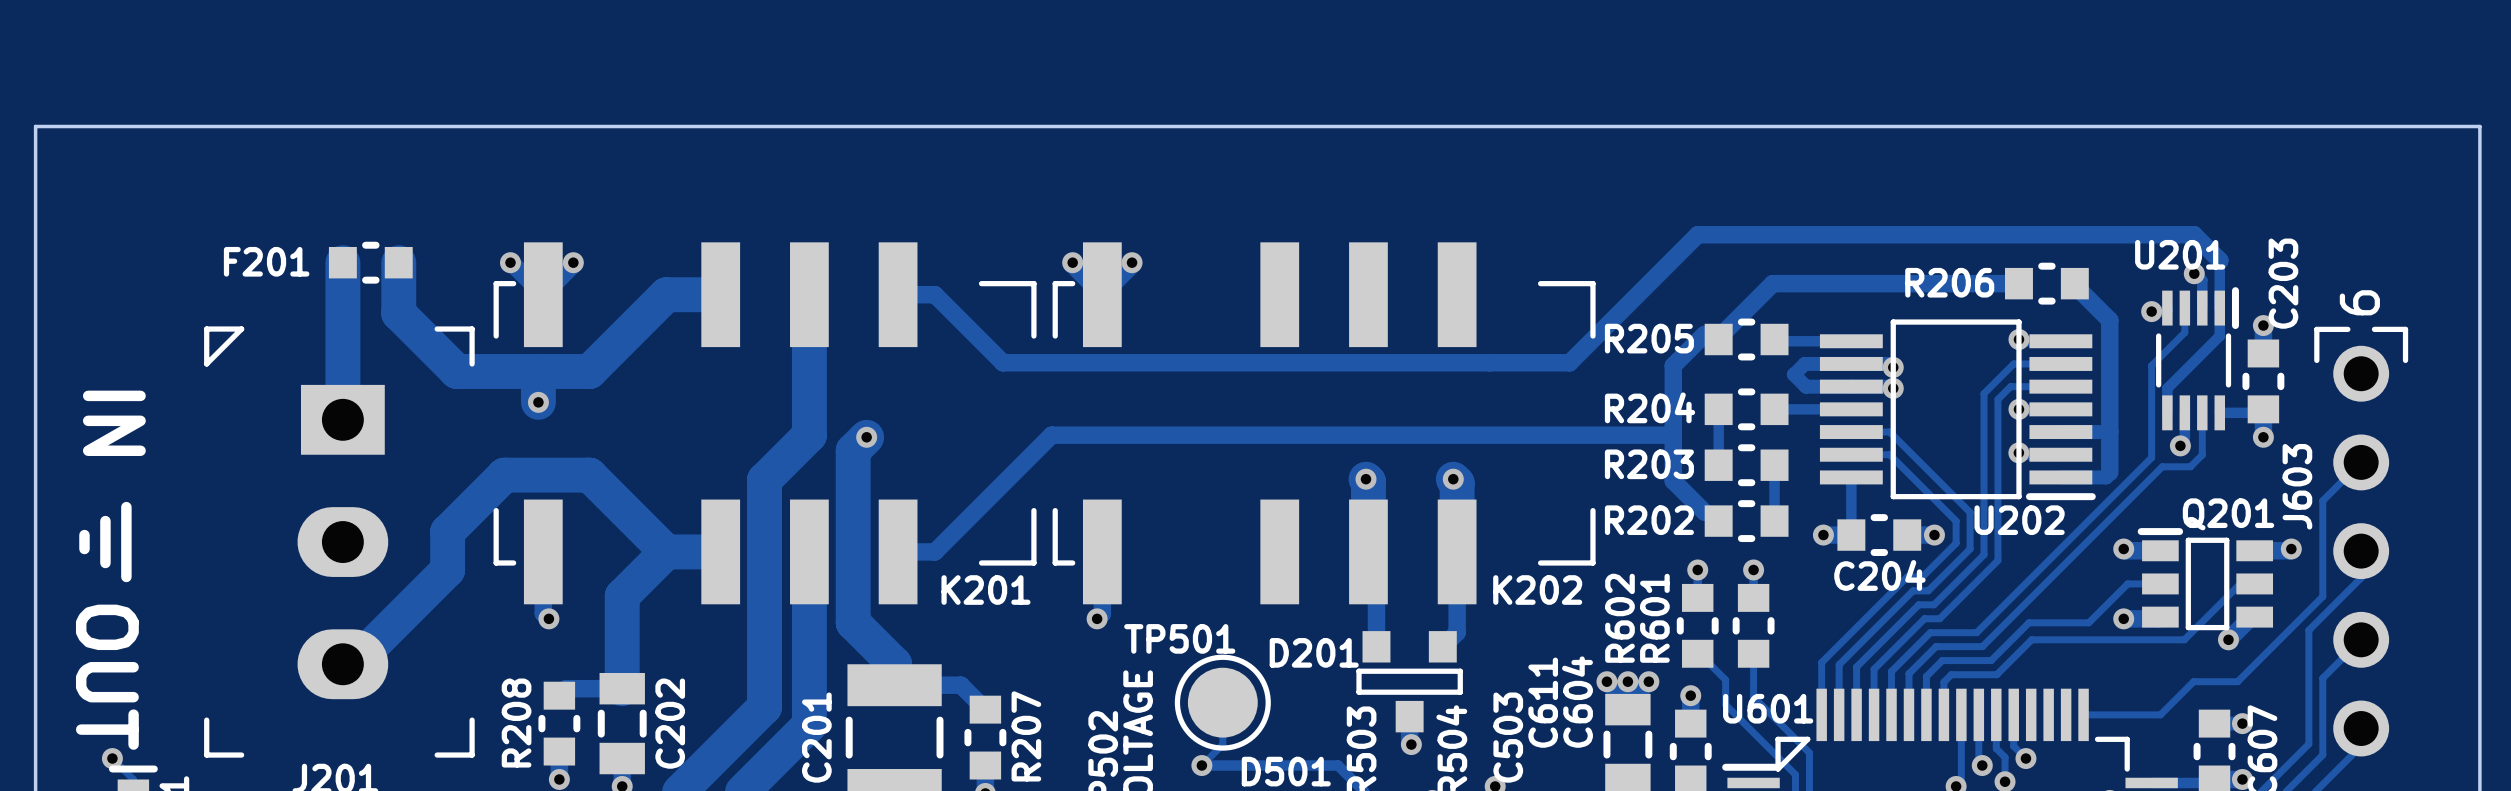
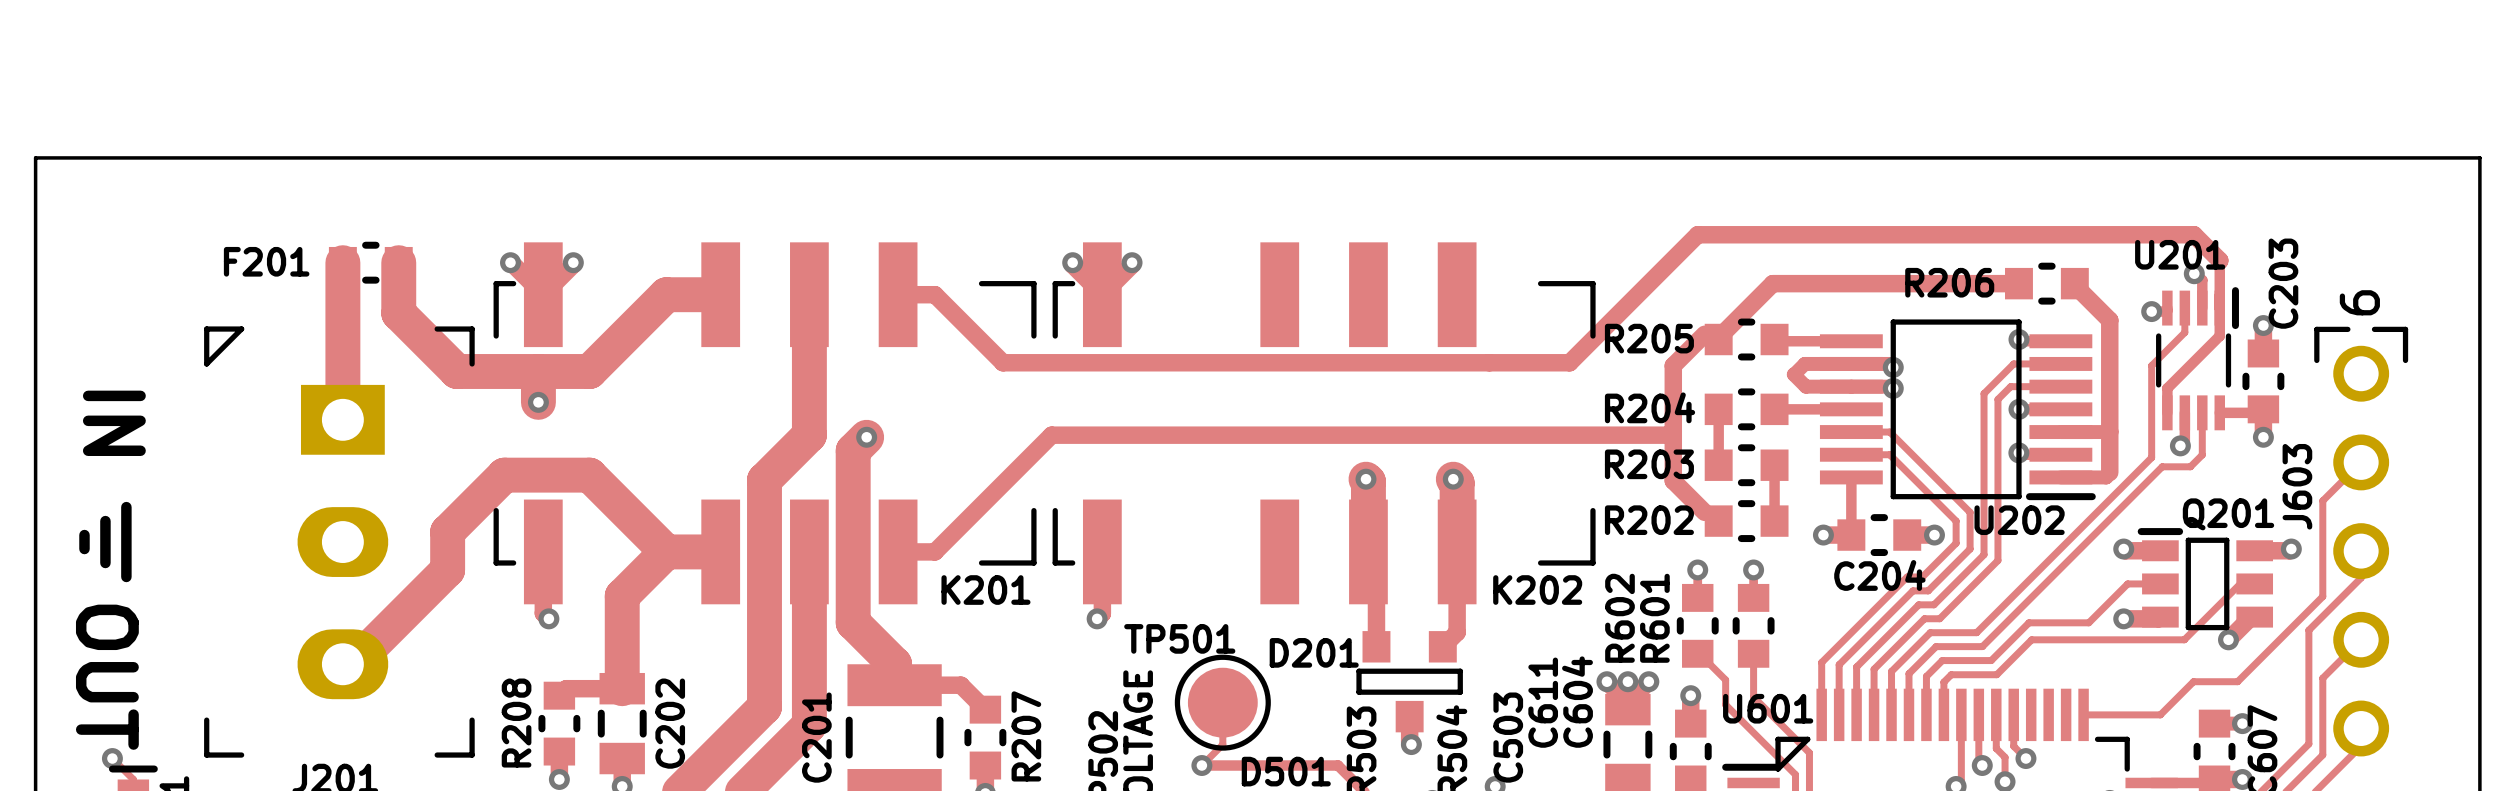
board edge: (35, 157) (35, 126) (2479, 126) (2479, 157) -> (35, 157) (2479, 157)

